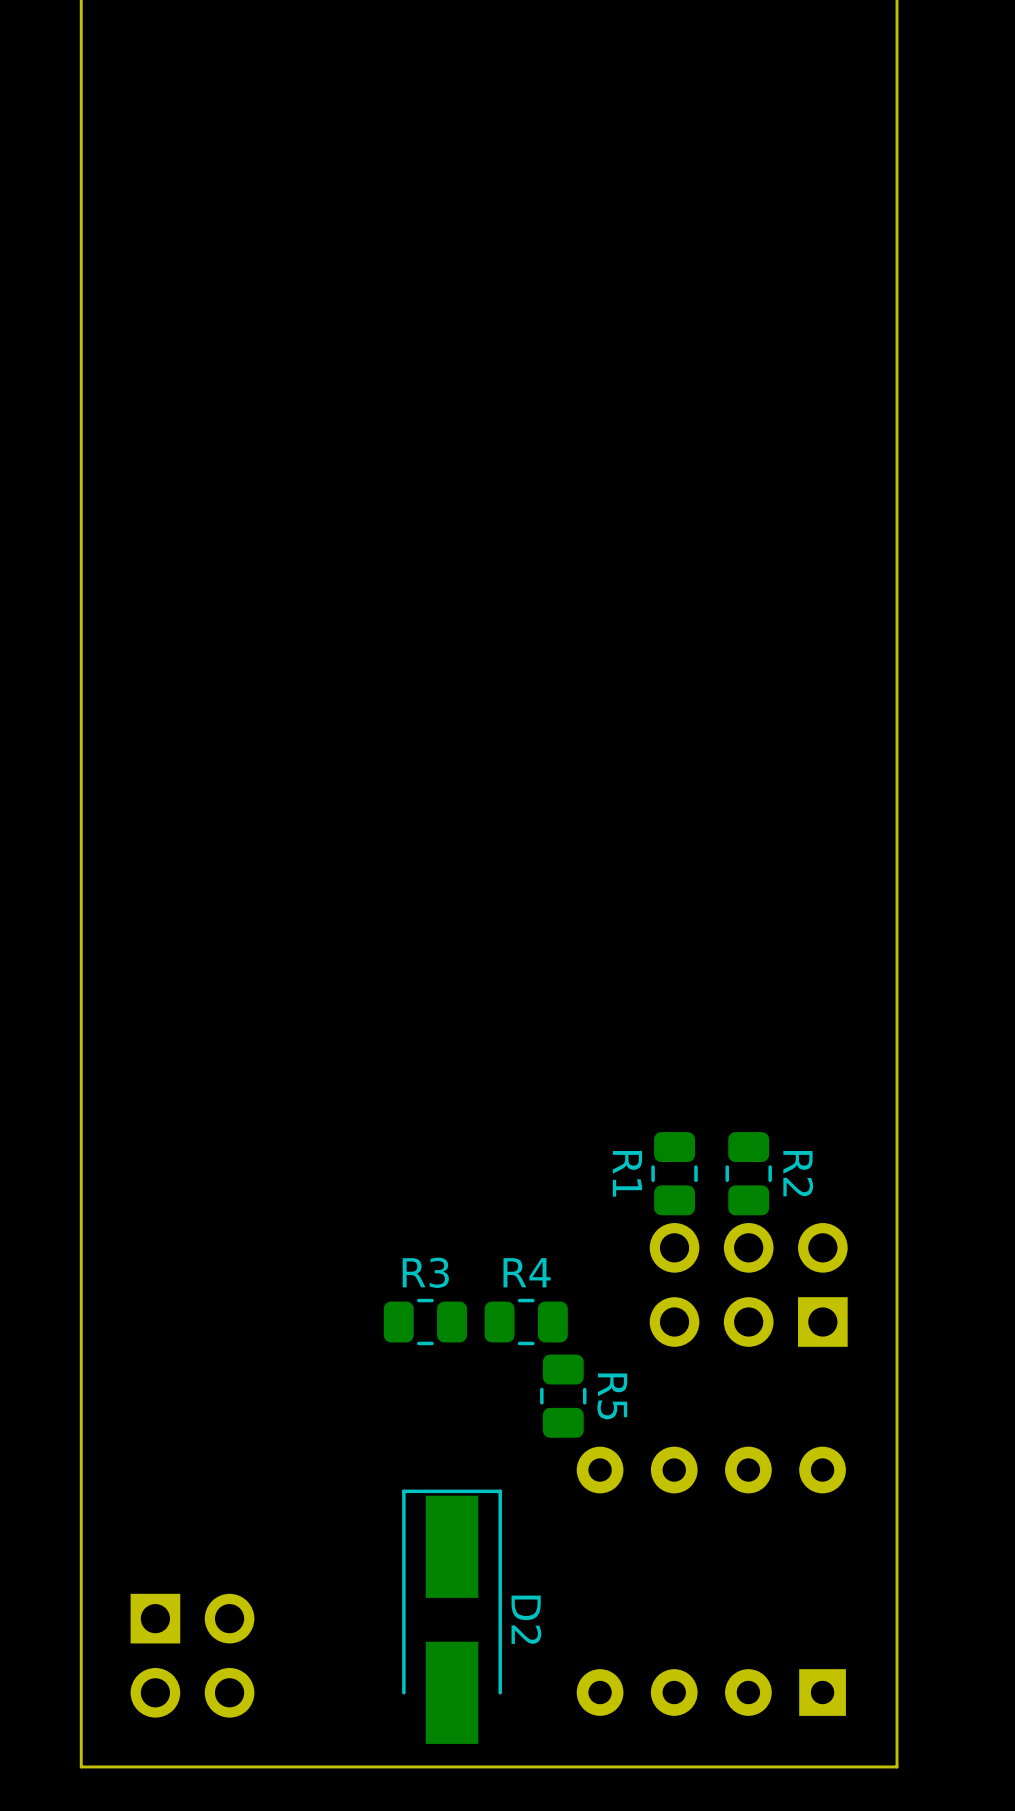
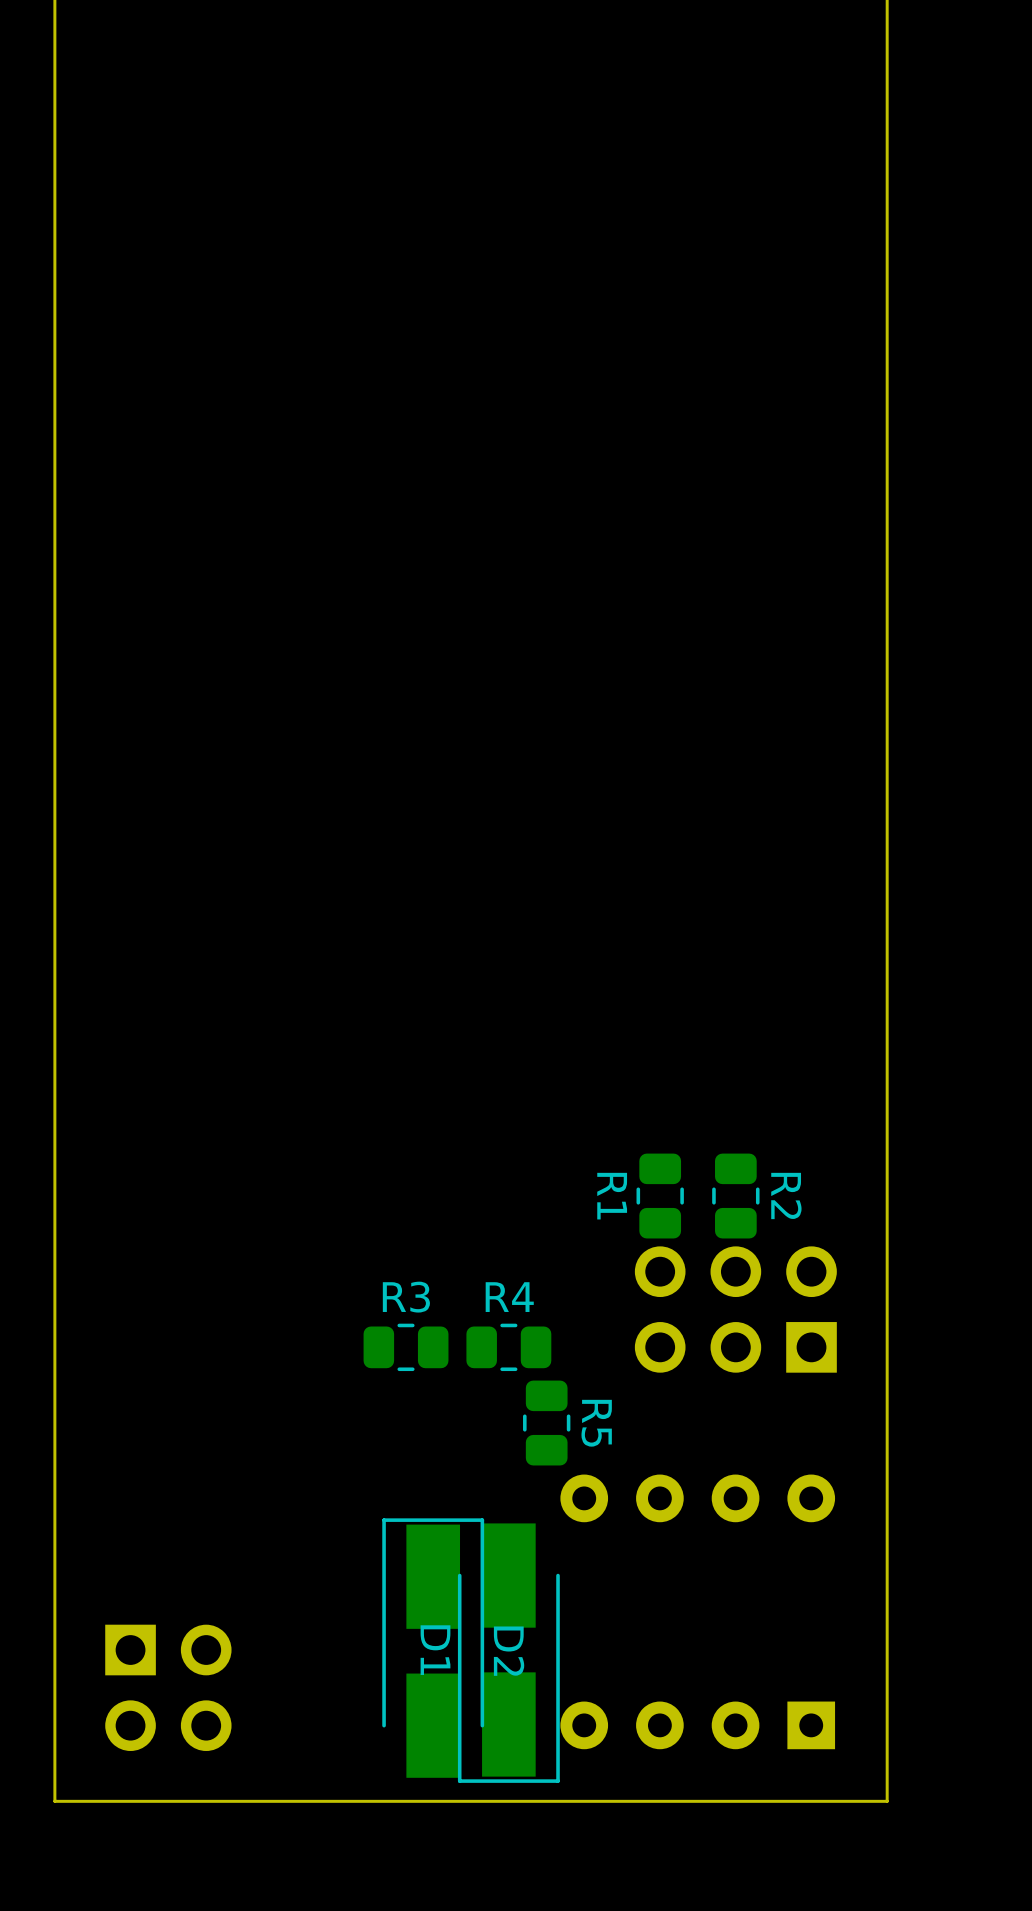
D1: none -> (508, 1653)

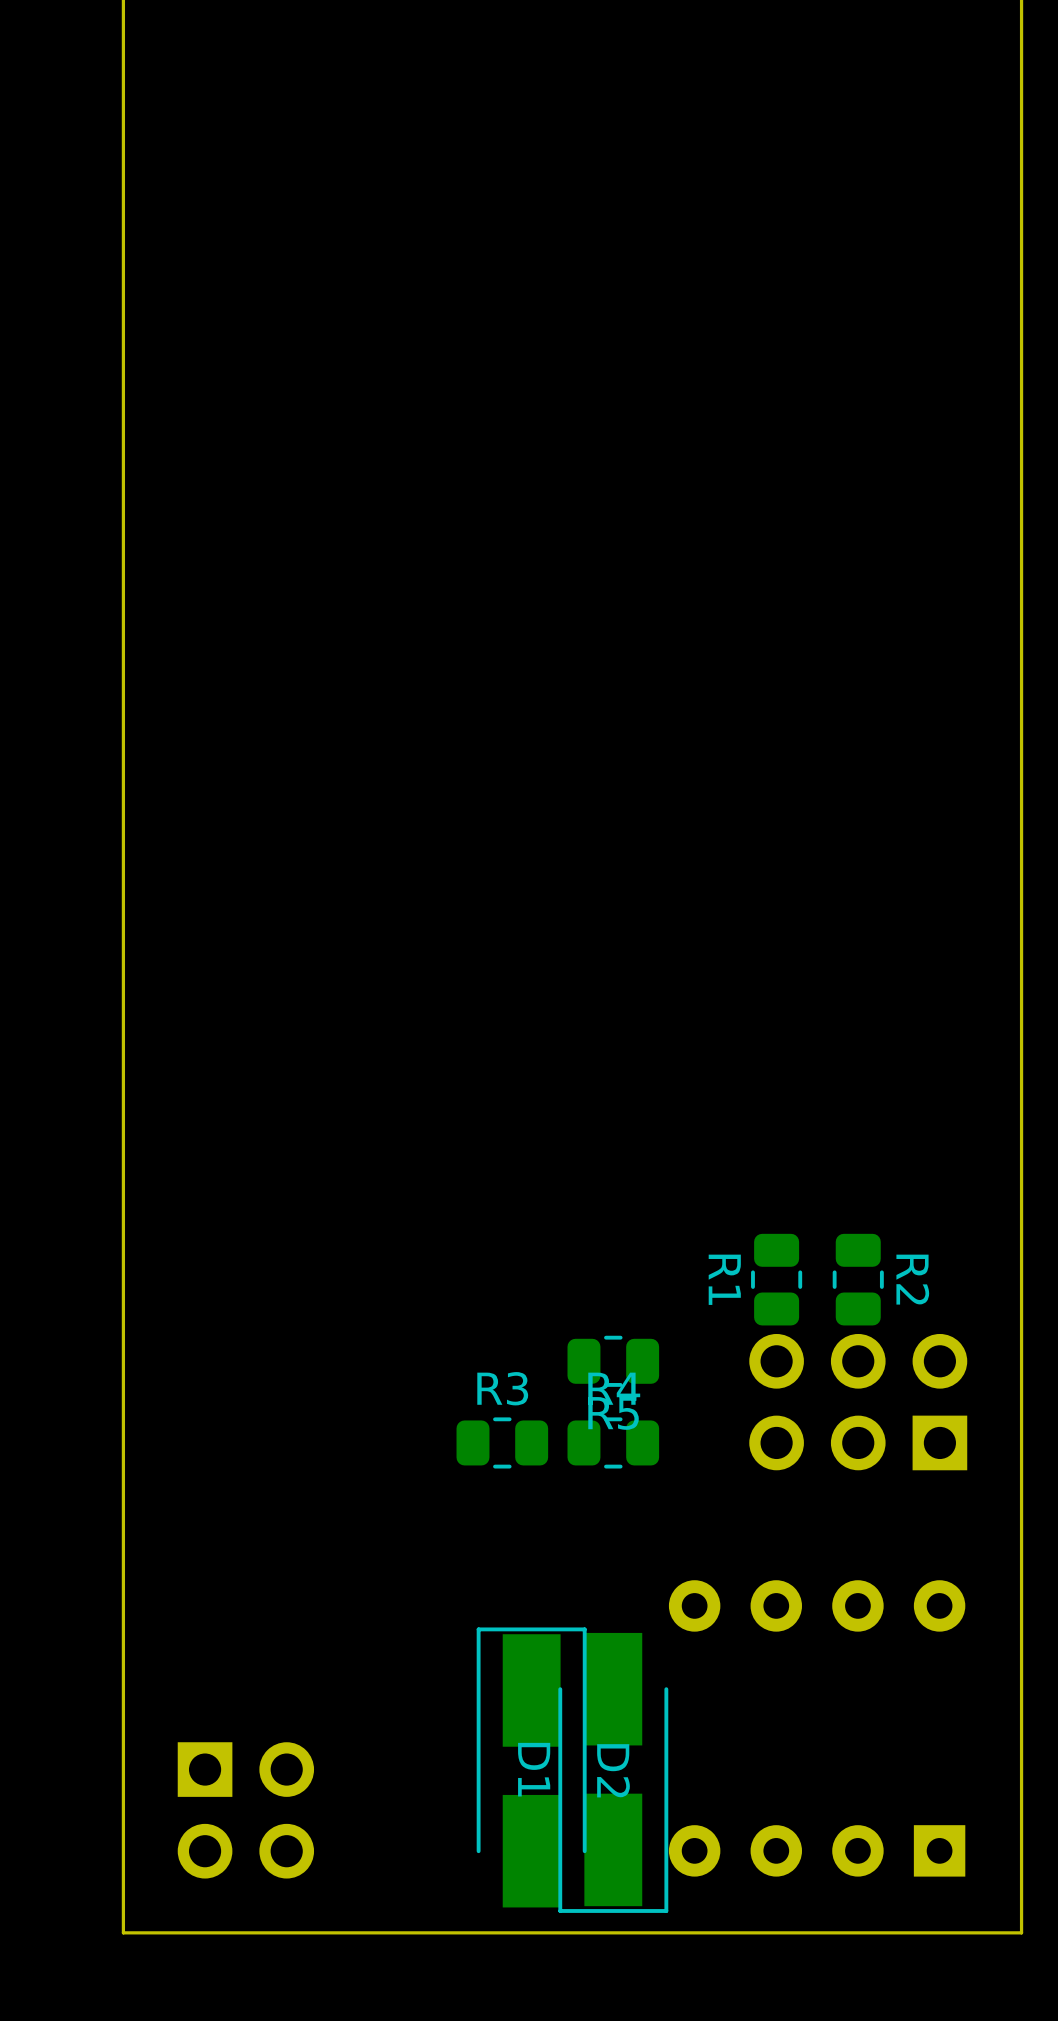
R5 rotation: 0° (546, 1423) -> 90° clockwise (613, 1361)
R5 position: (546, 1423) -> (613, 1361)

